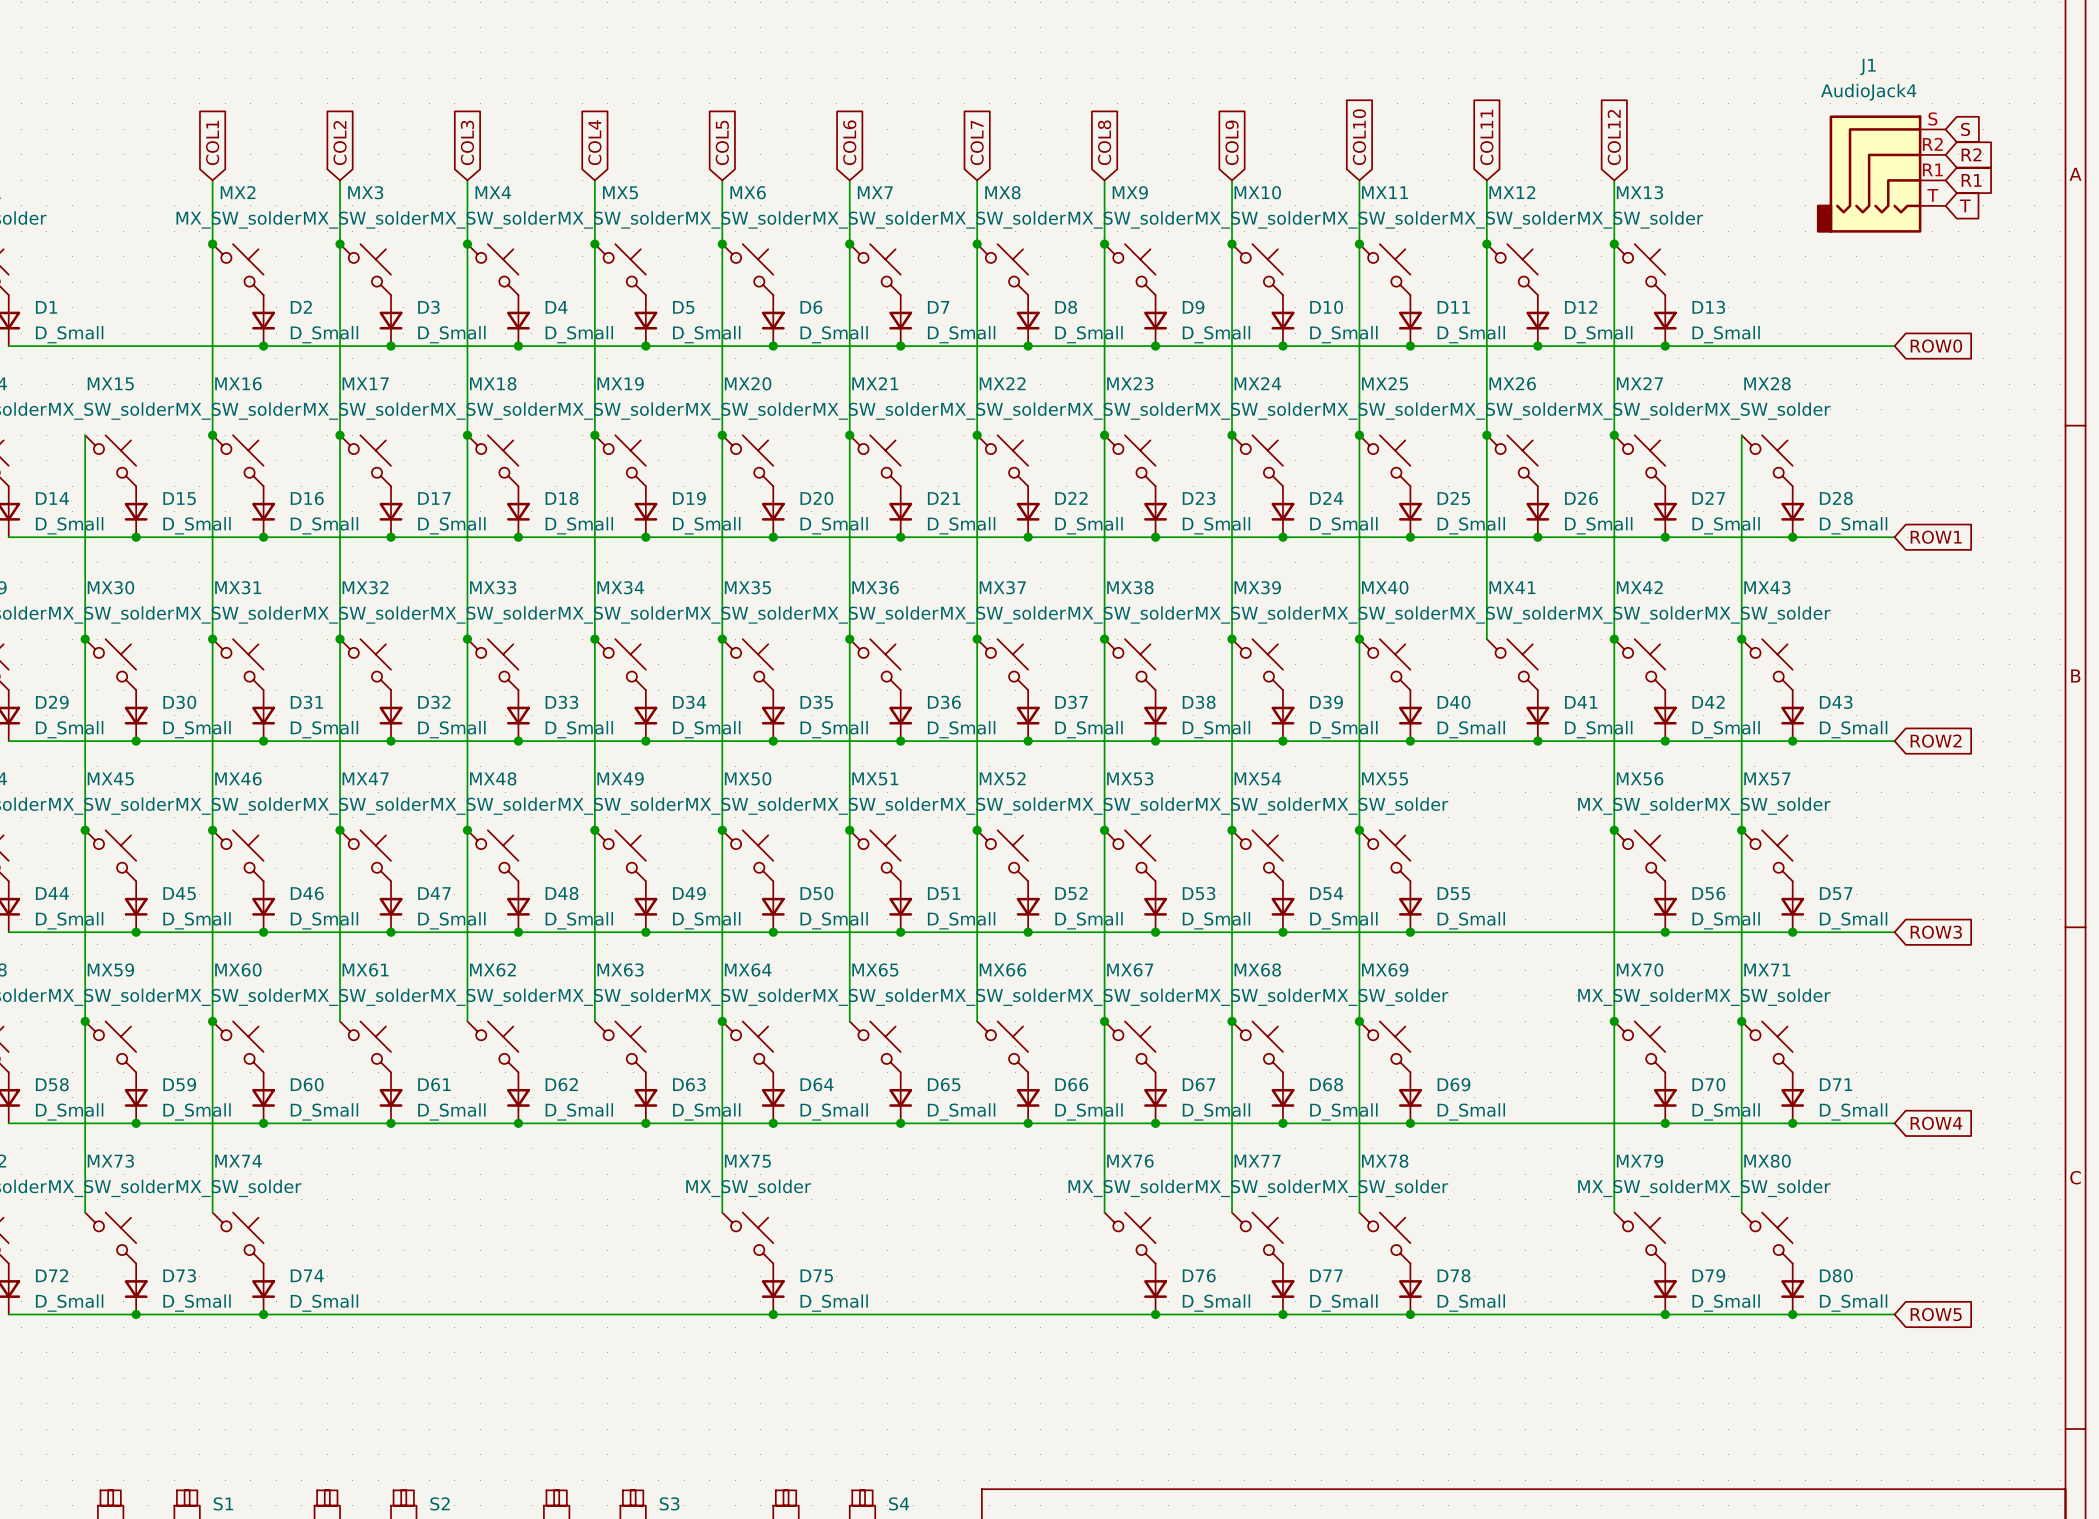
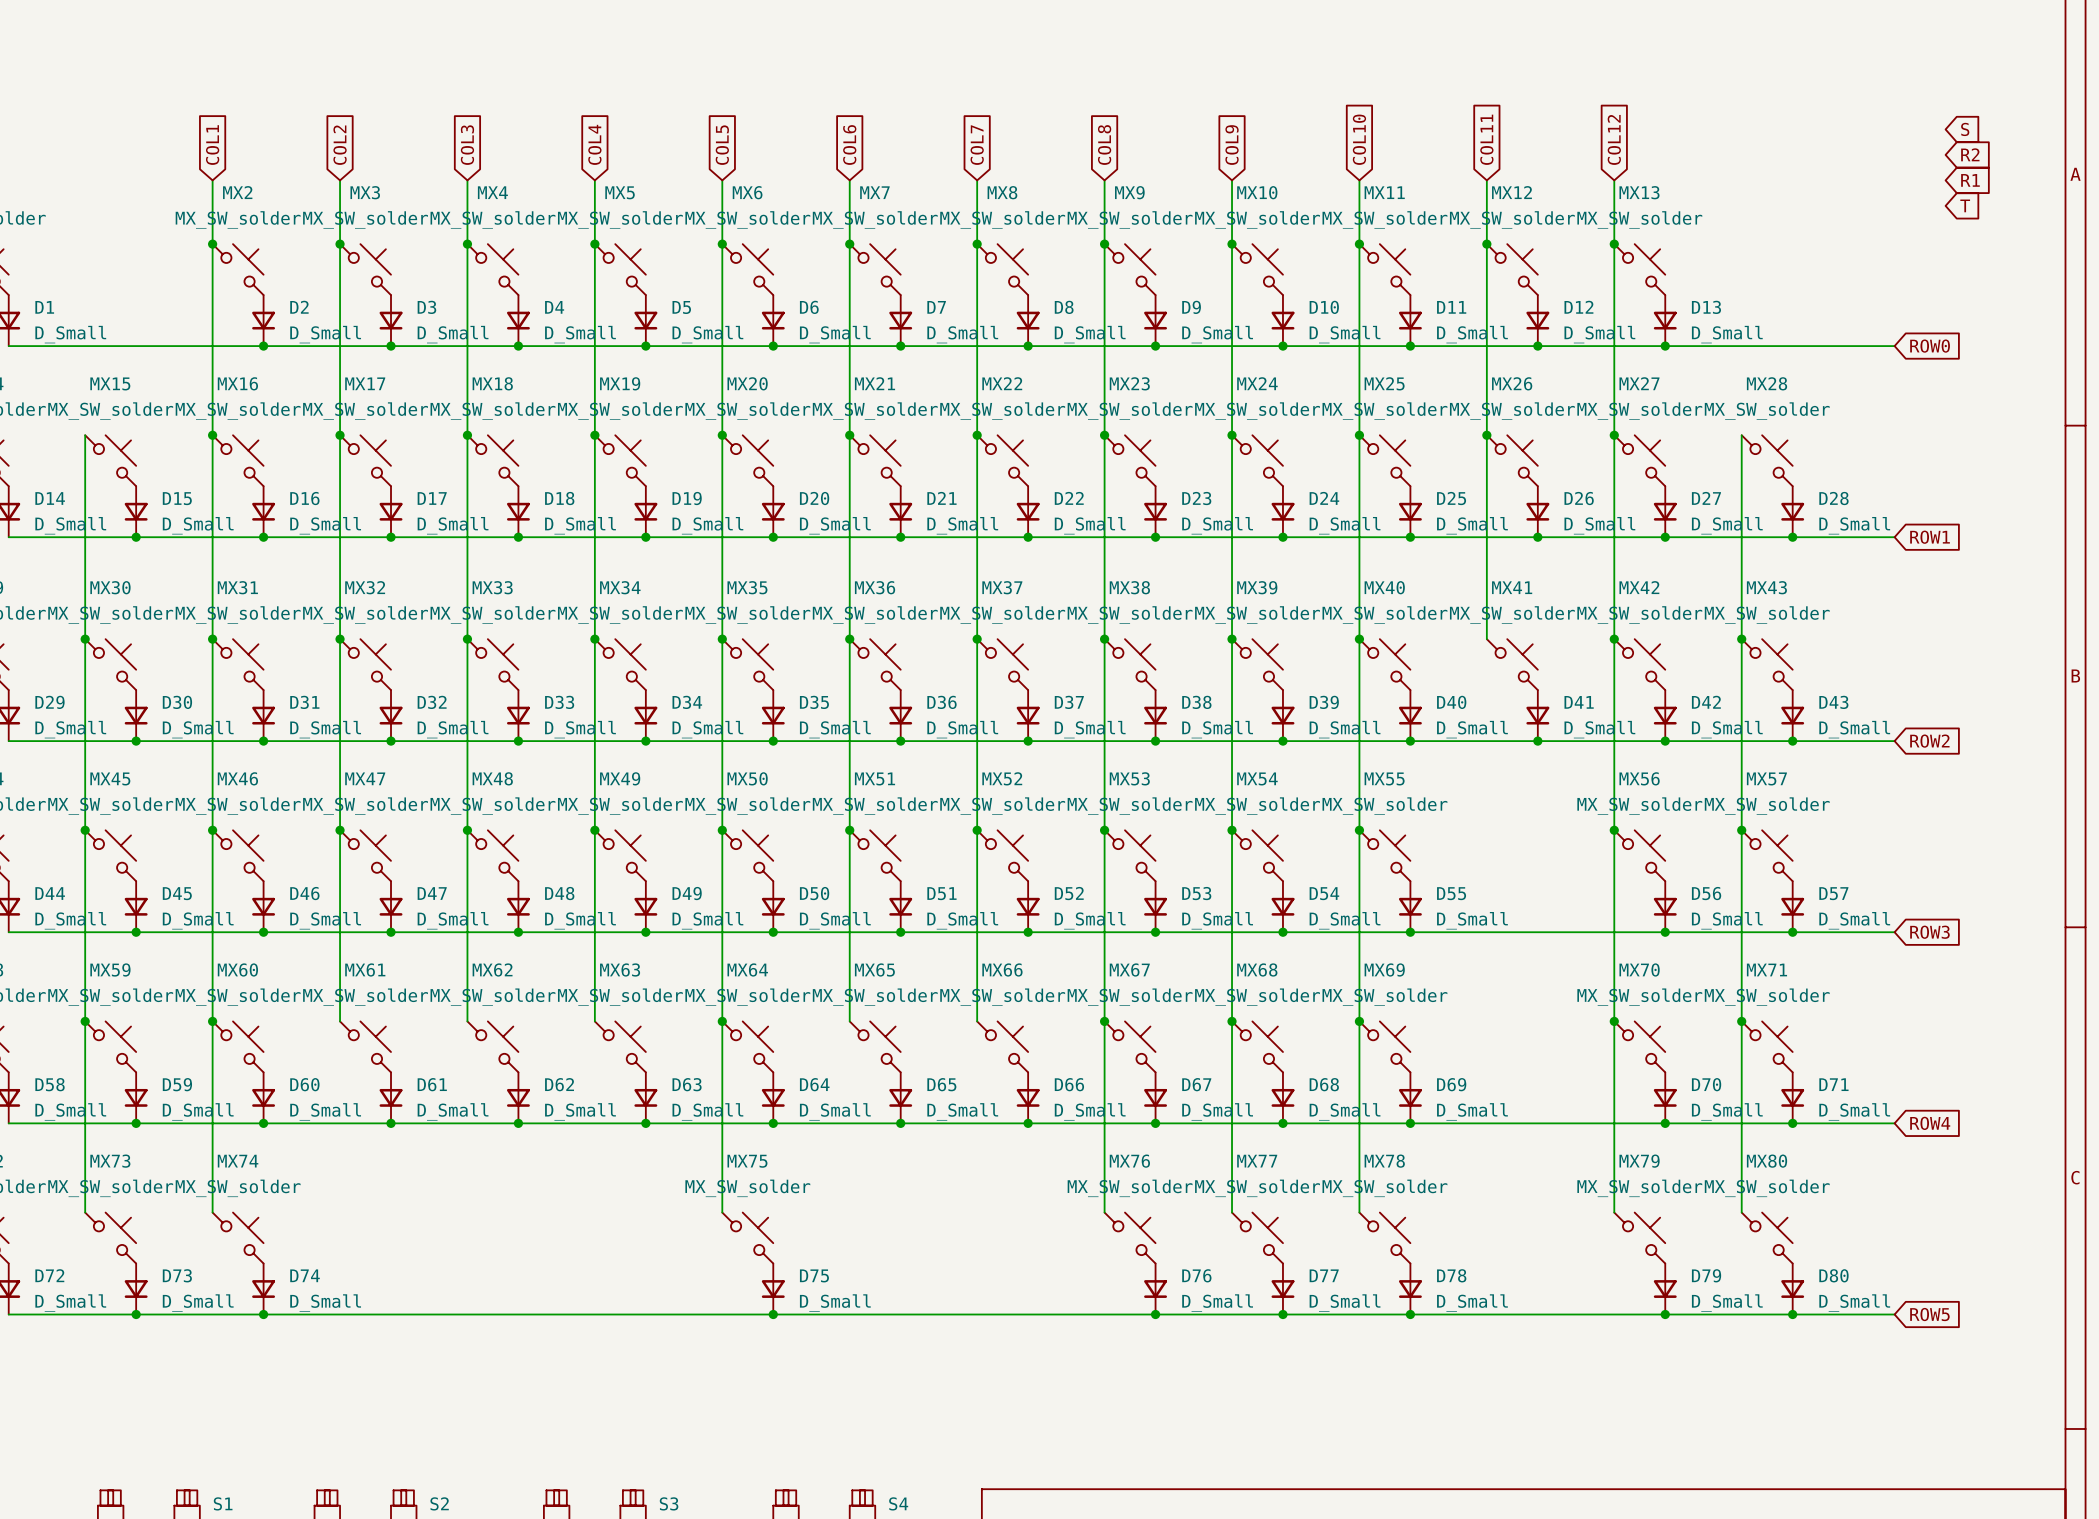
J1: AudioJack4 (1881, 174) -> none

